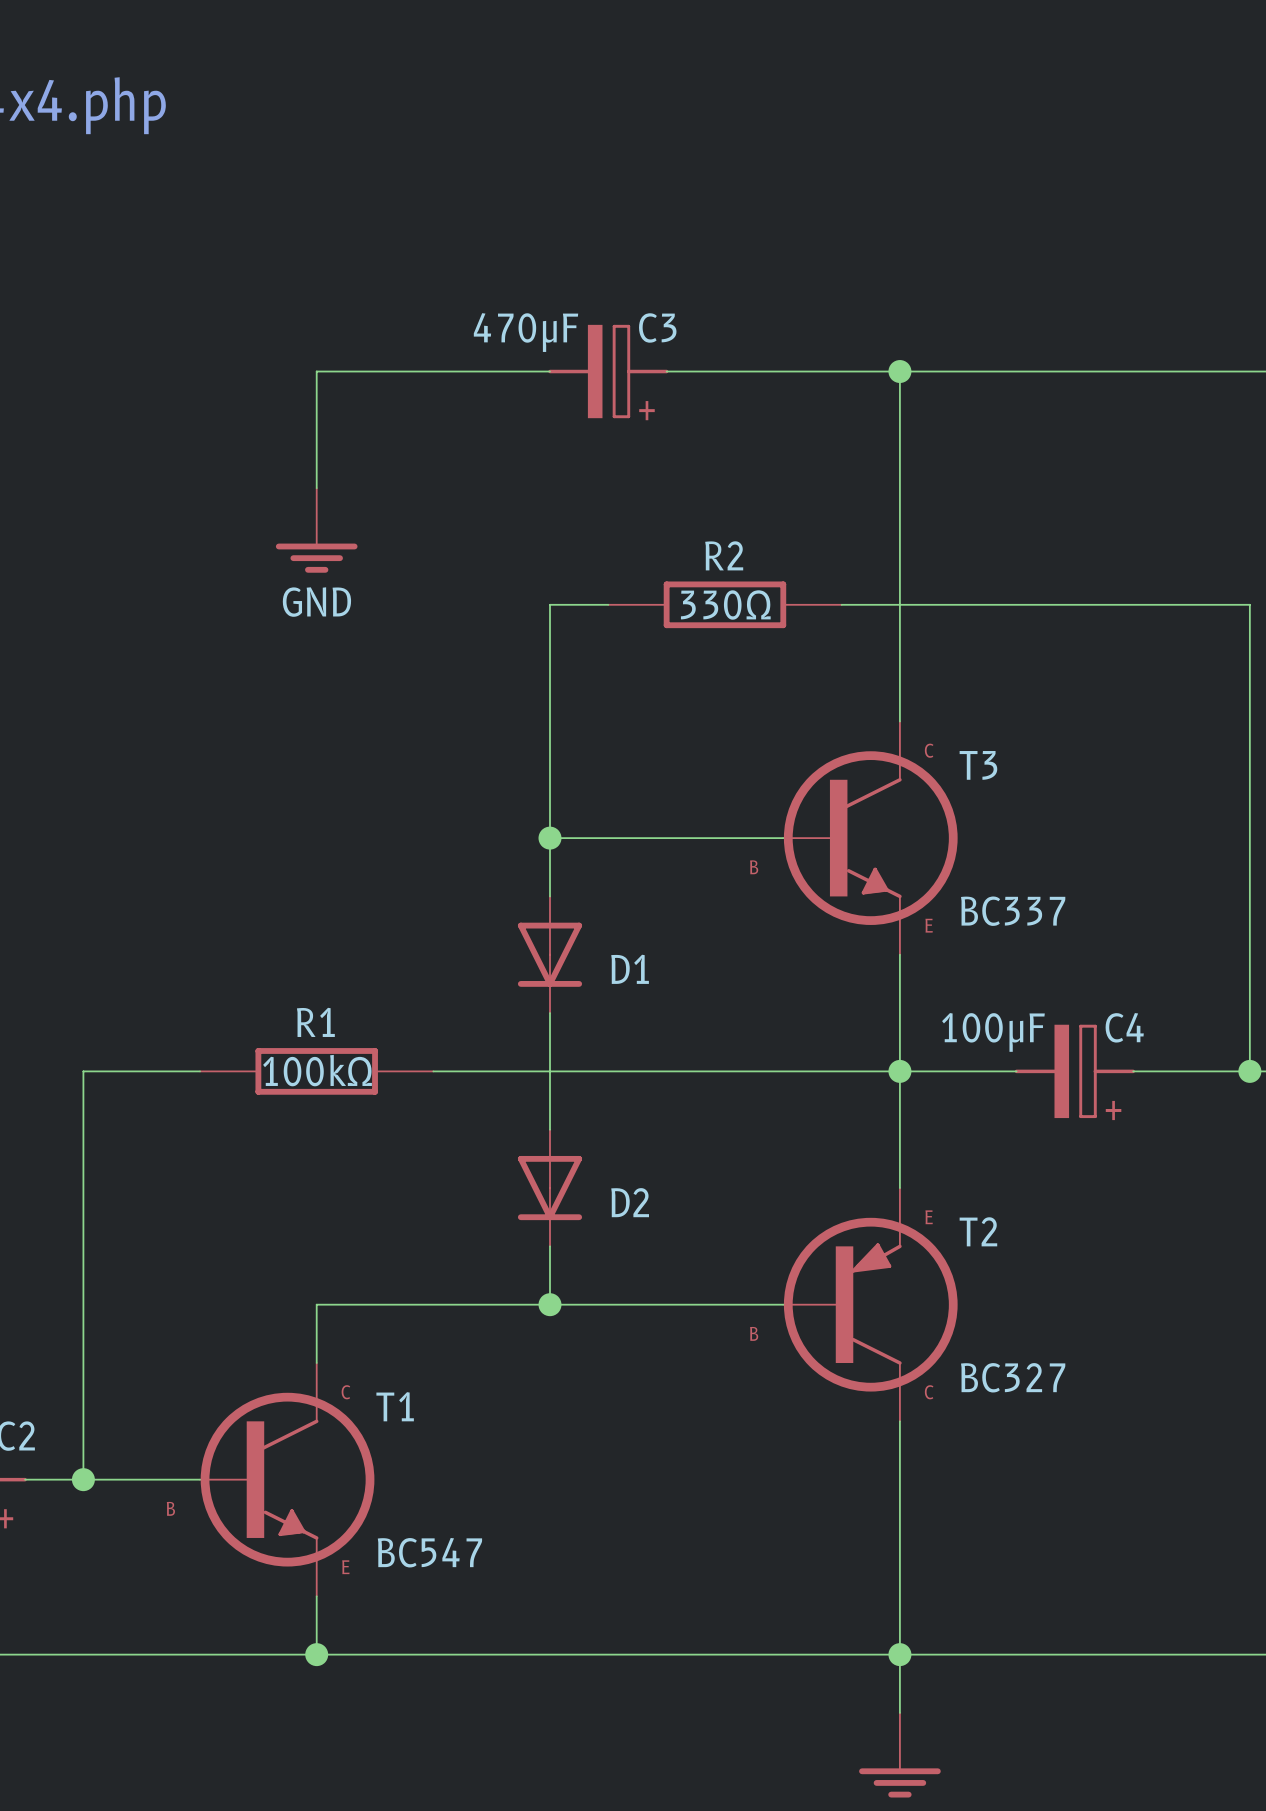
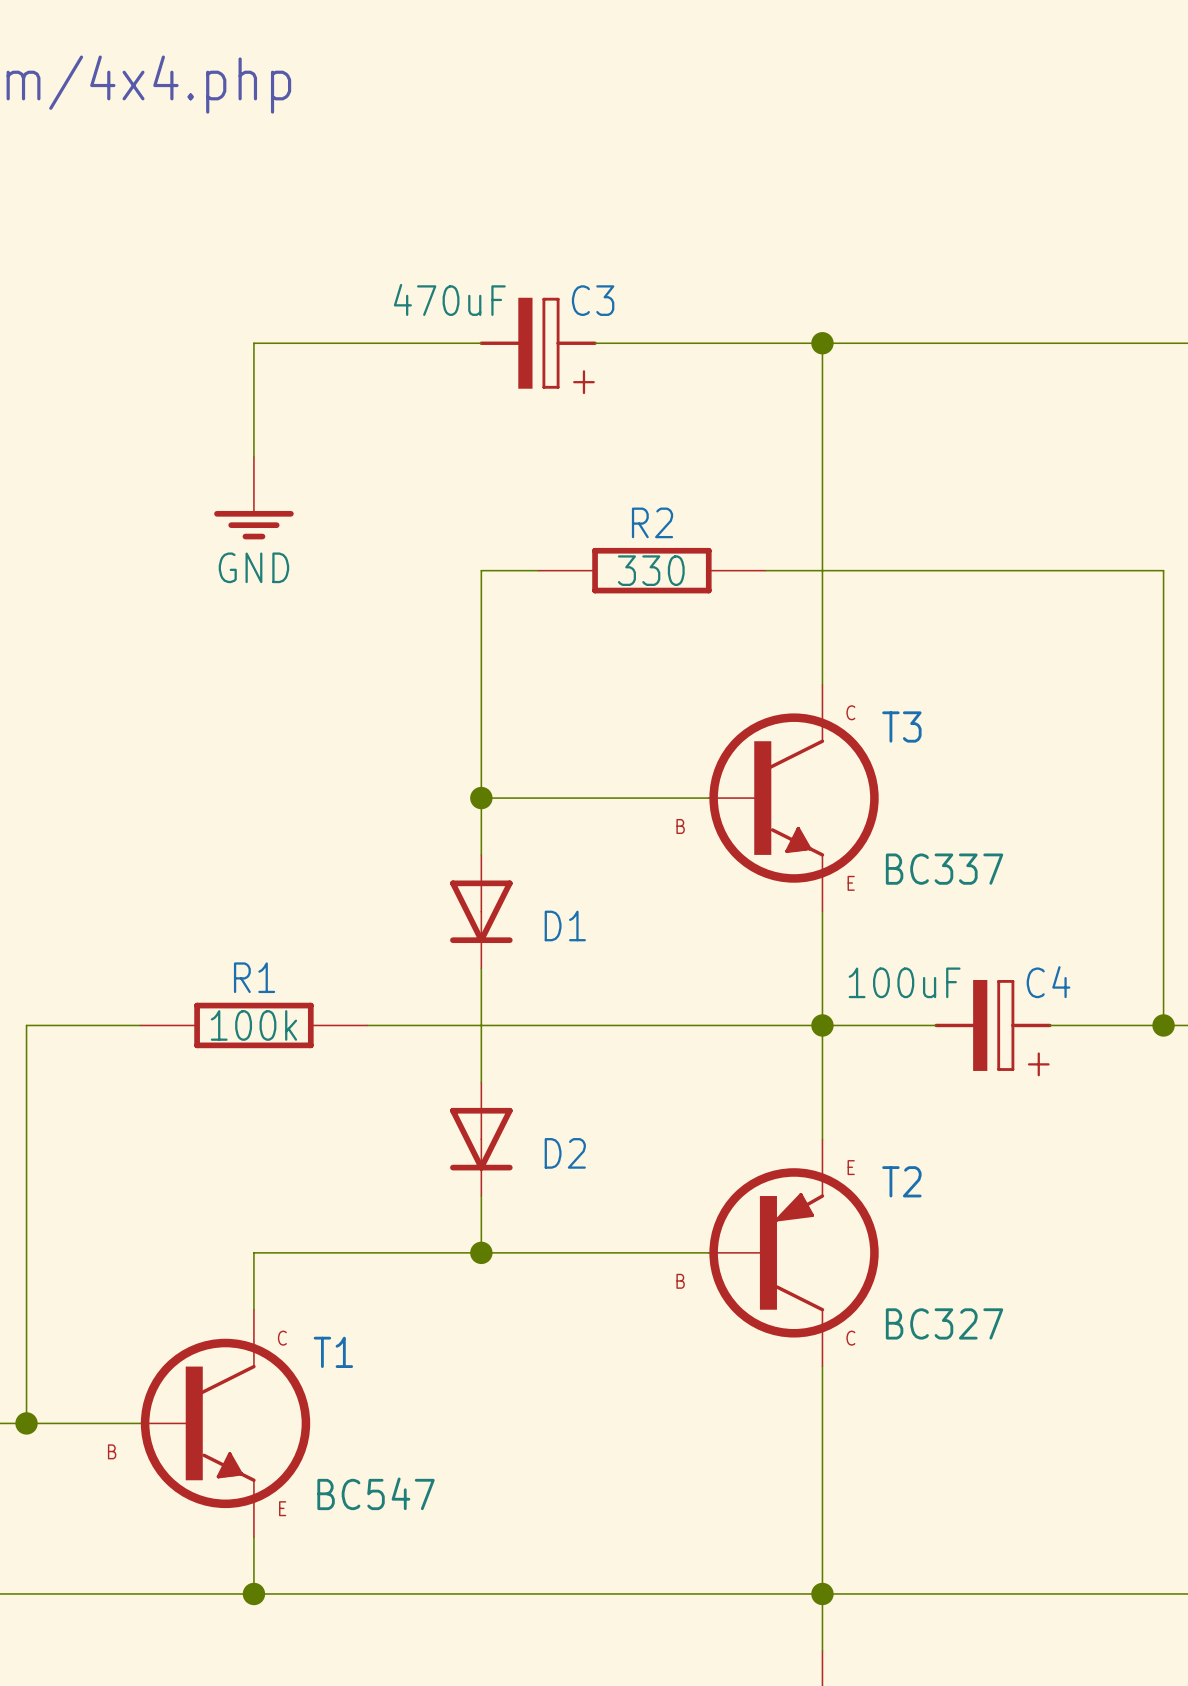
C3 value: 470μF (526, 332) -> 470uF (449, 299)
R2 value: 330Ω (725, 605) -> 330 (651, 570)
C4 value: 100μF (993, 1032) -> 100uF (904, 982)
R1 value: 100kΩ (317, 1070) -> 100k (253, 1025)

